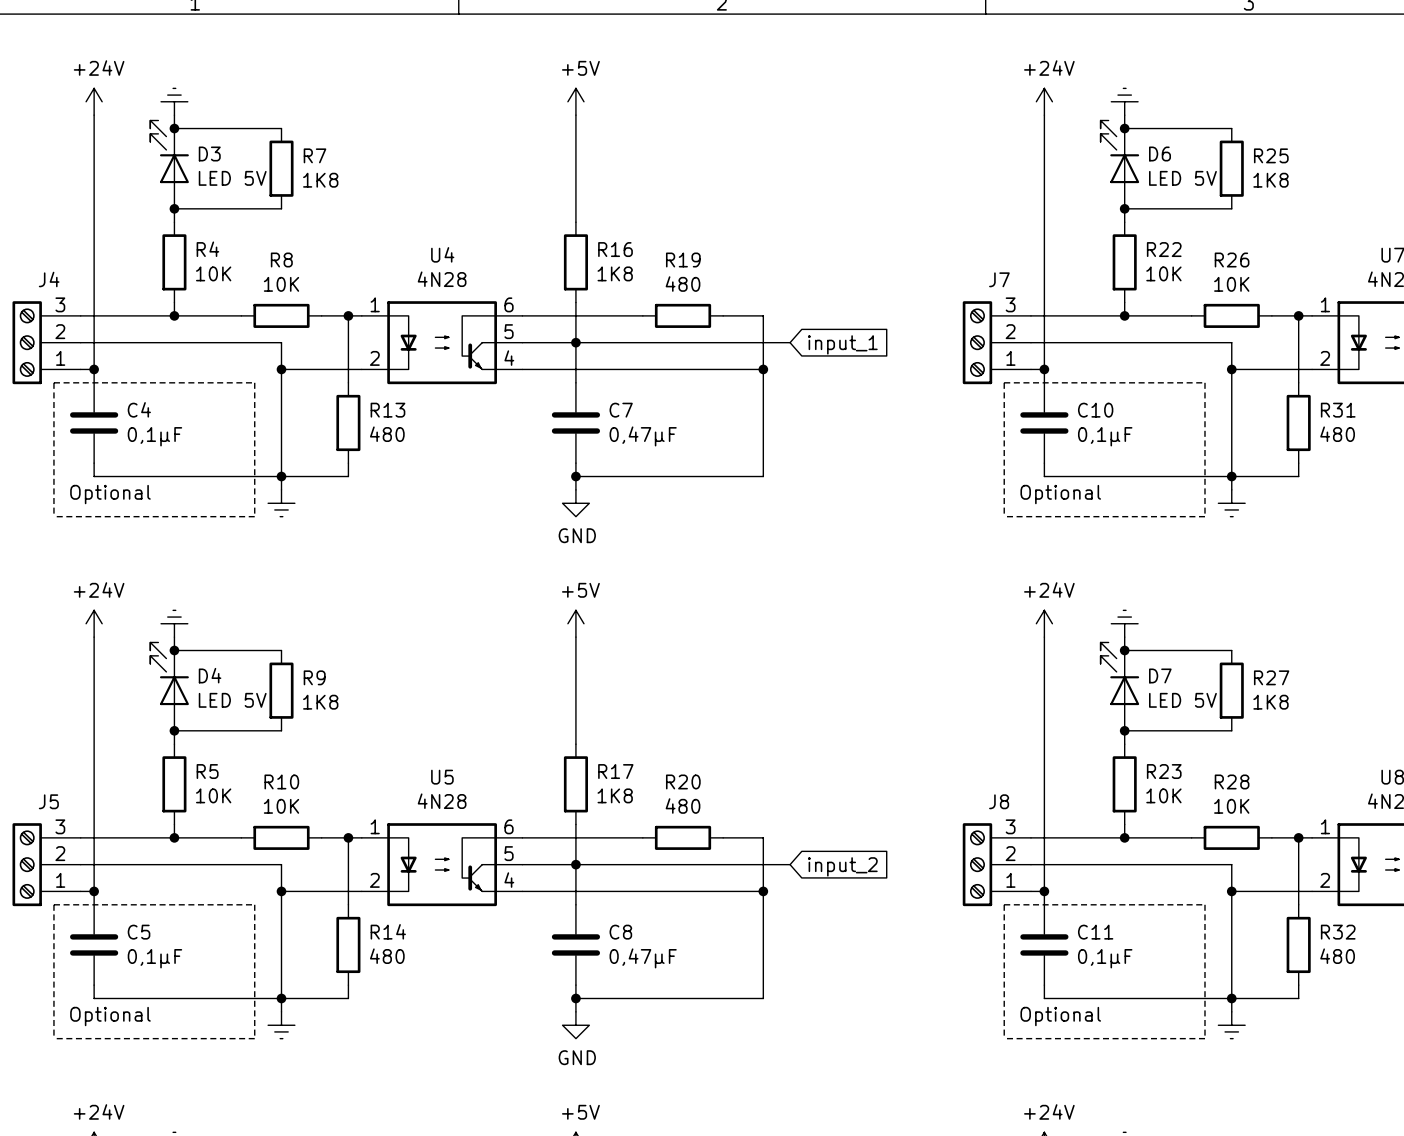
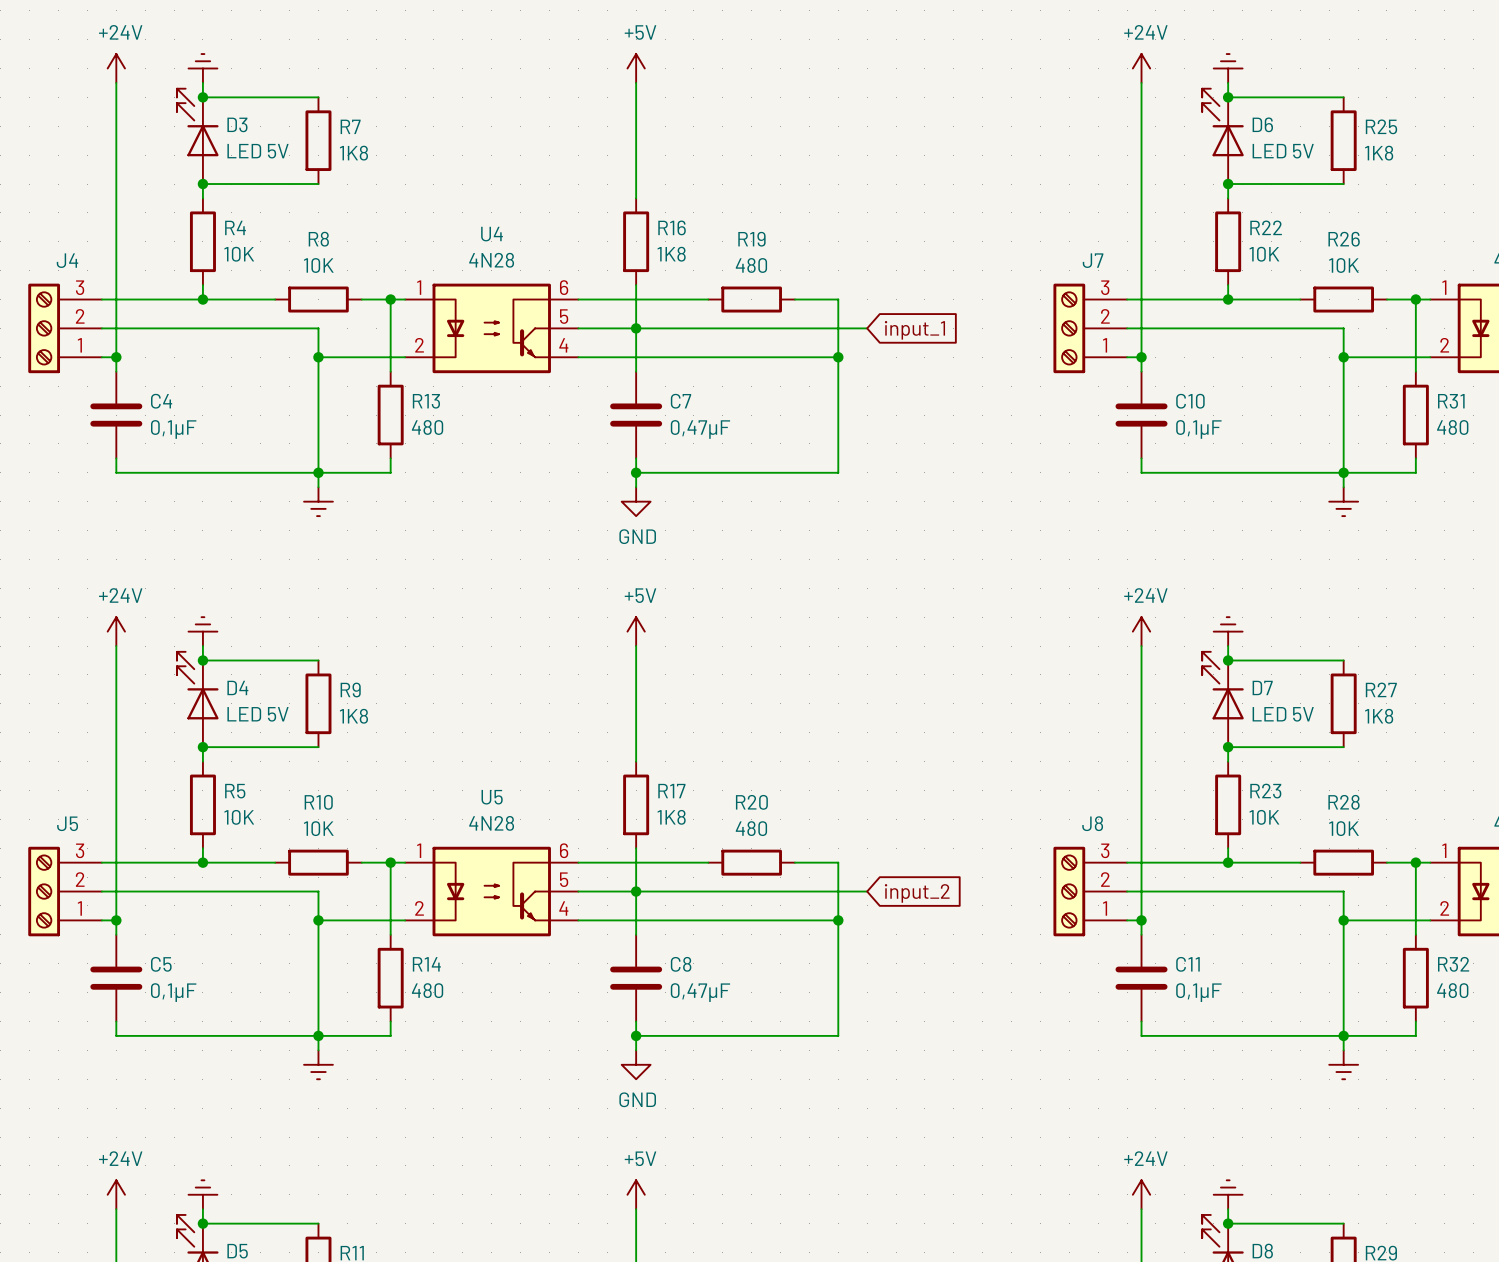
line: (53, 382) (254, 382) (254, 516) (53, 516) (53, 382) -> none
line: (1004, 382) (1204, 382) (1204, 516) (1004, 516) (1004, 382) -> none
text: Optional (110, 494) -> none
text: Optional (1060, 494) -> none
line: (53, 904) (53, 1038) (254, 1038) (254, 904) (53, 904) -> none
line: (1004, 904) (1004, 1038) (1204, 1038) (1204, 904) (1004, 904) -> none
text: Optional (110, 1016) -> none
text: Optional (1060, 1016) -> none

